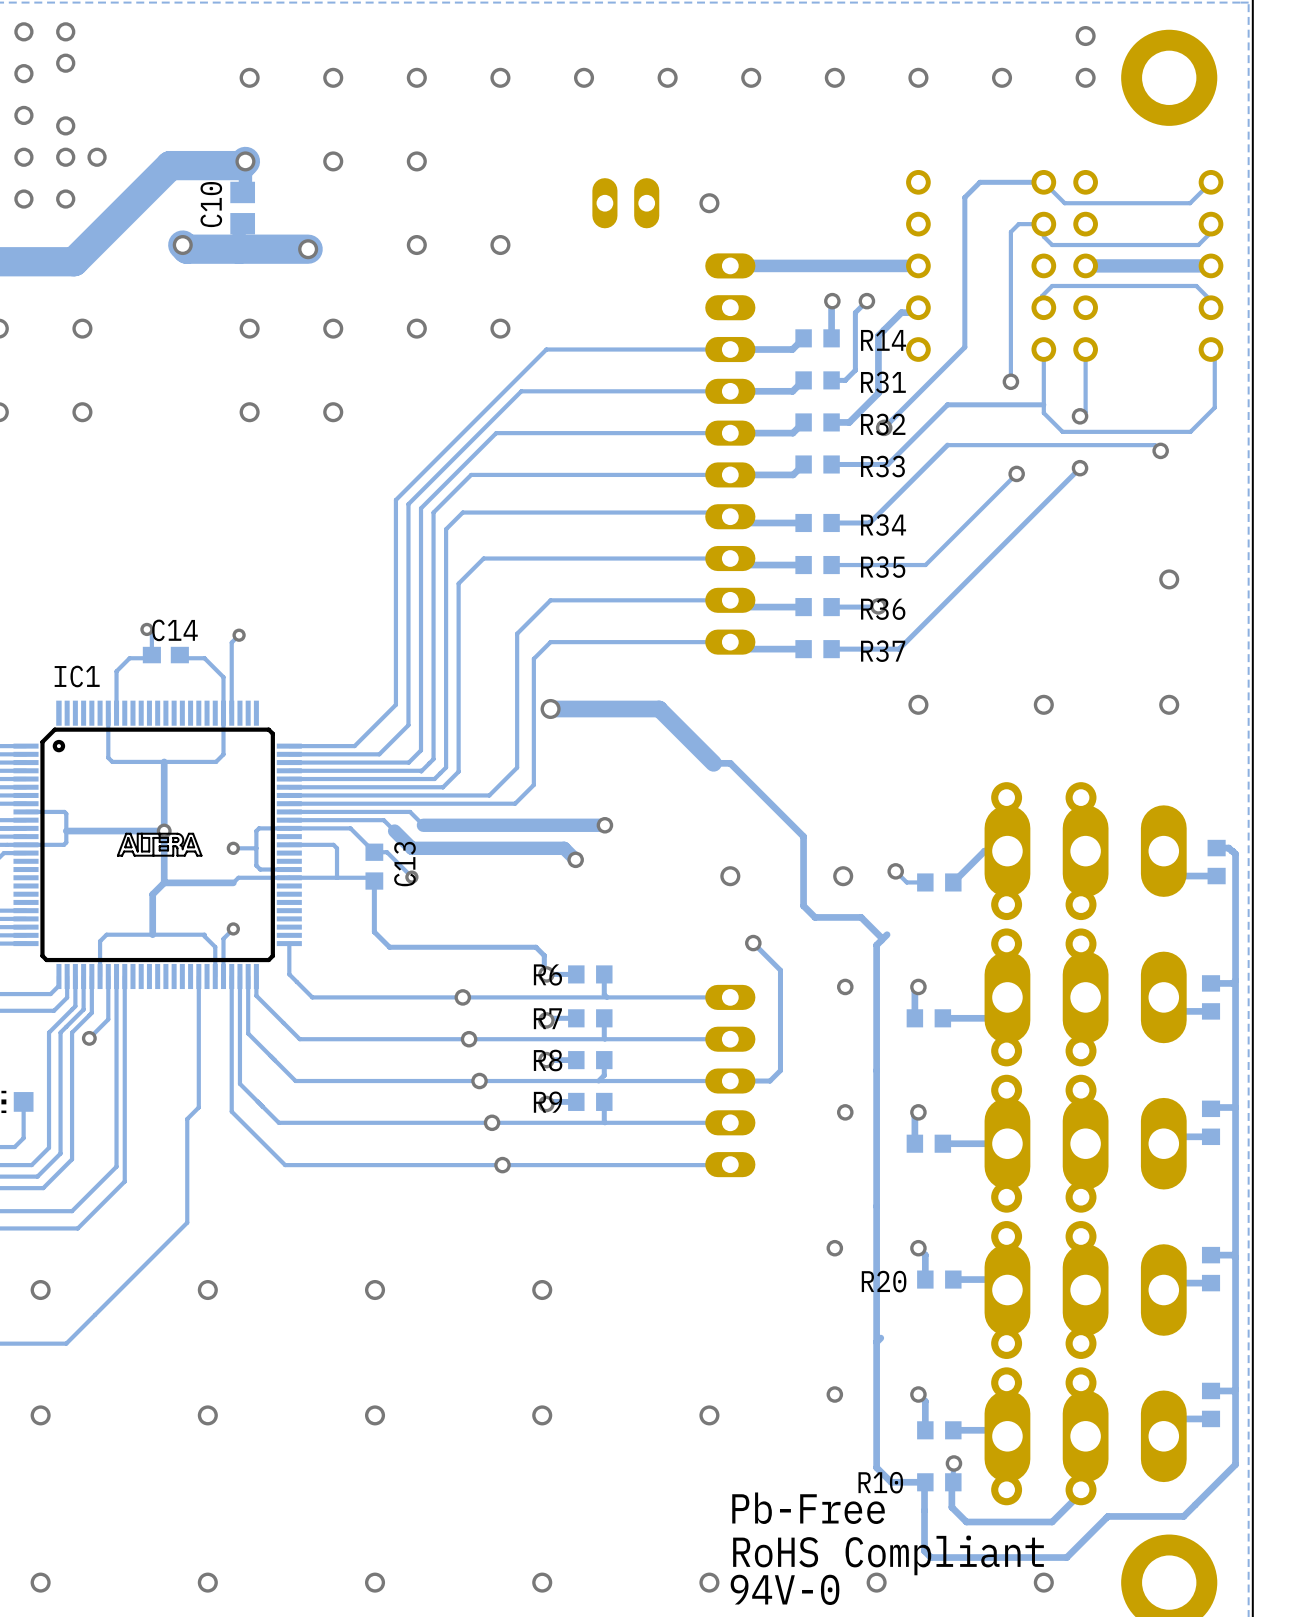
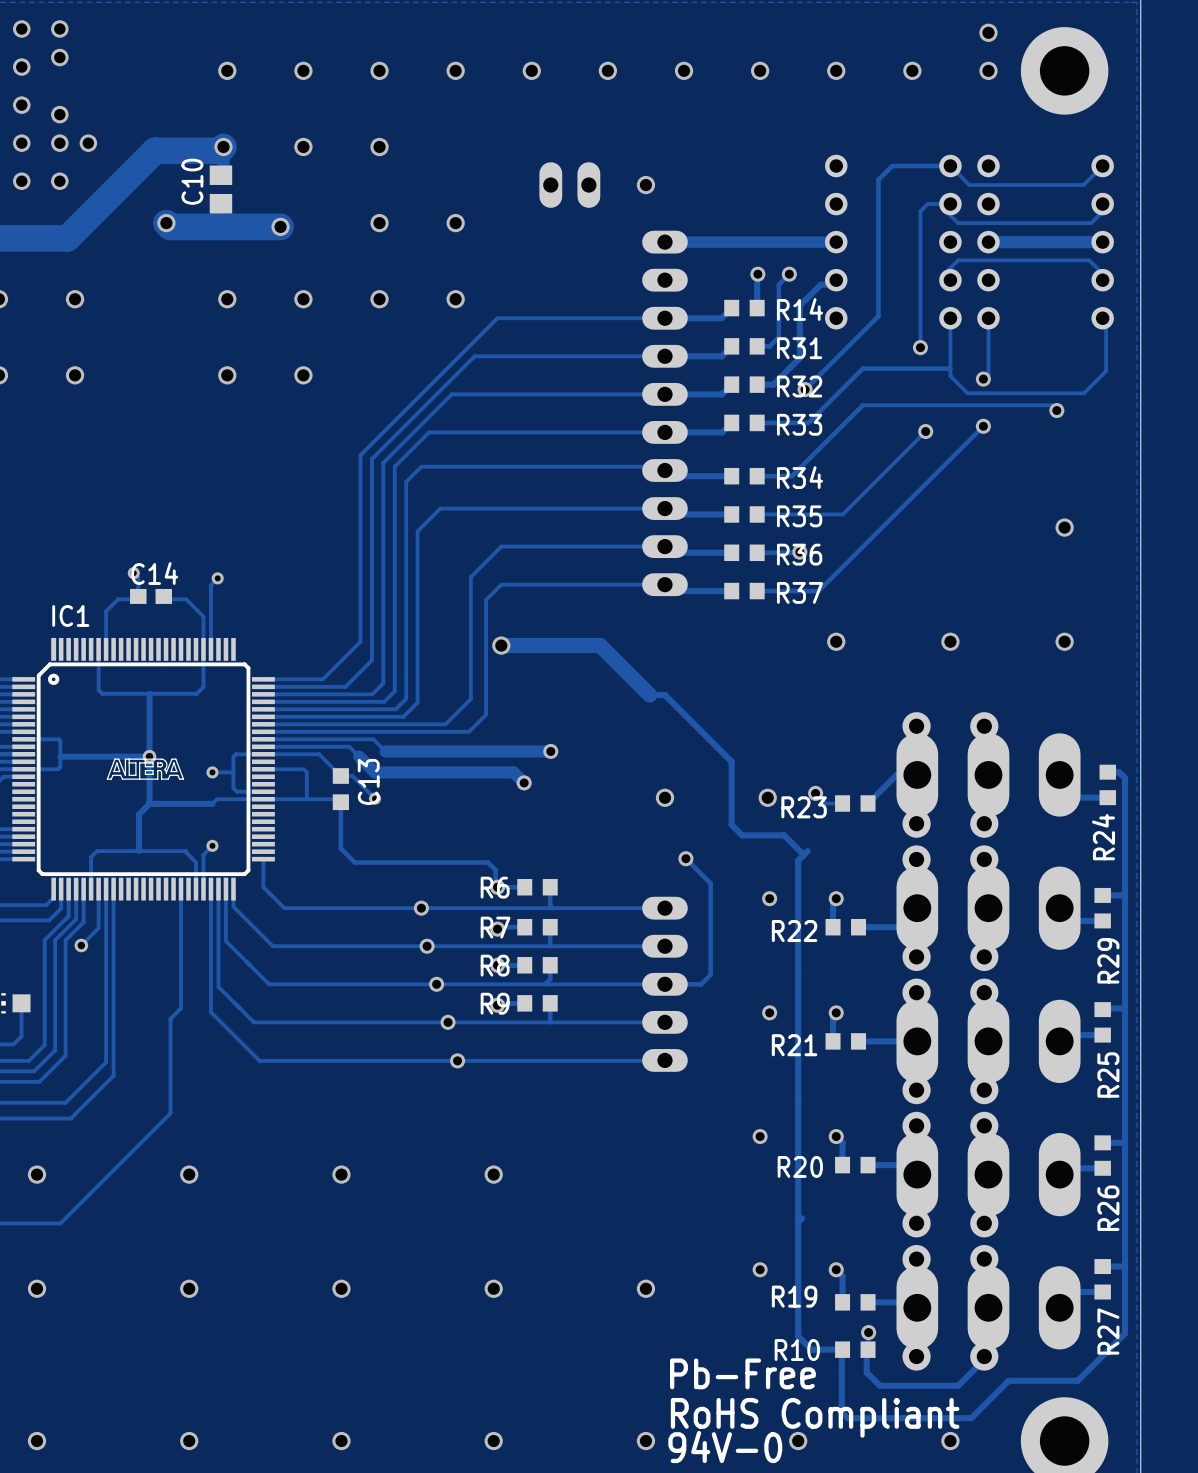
R23 name: none -> R23 (804, 807)
R24 name: none -> R24 (1103, 837)
R22 name: none -> R22 (794, 931)
R29 name: none -> R29 (1108, 960)
R21 name: none -> R21 (794, 1045)
R25 name: none -> R25 (1108, 1075)
R26 name: none -> R26 (1108, 1208)
R19 name: none -> R19 (794, 1296)
R27 name: none -> R27 (1108, 1331)

